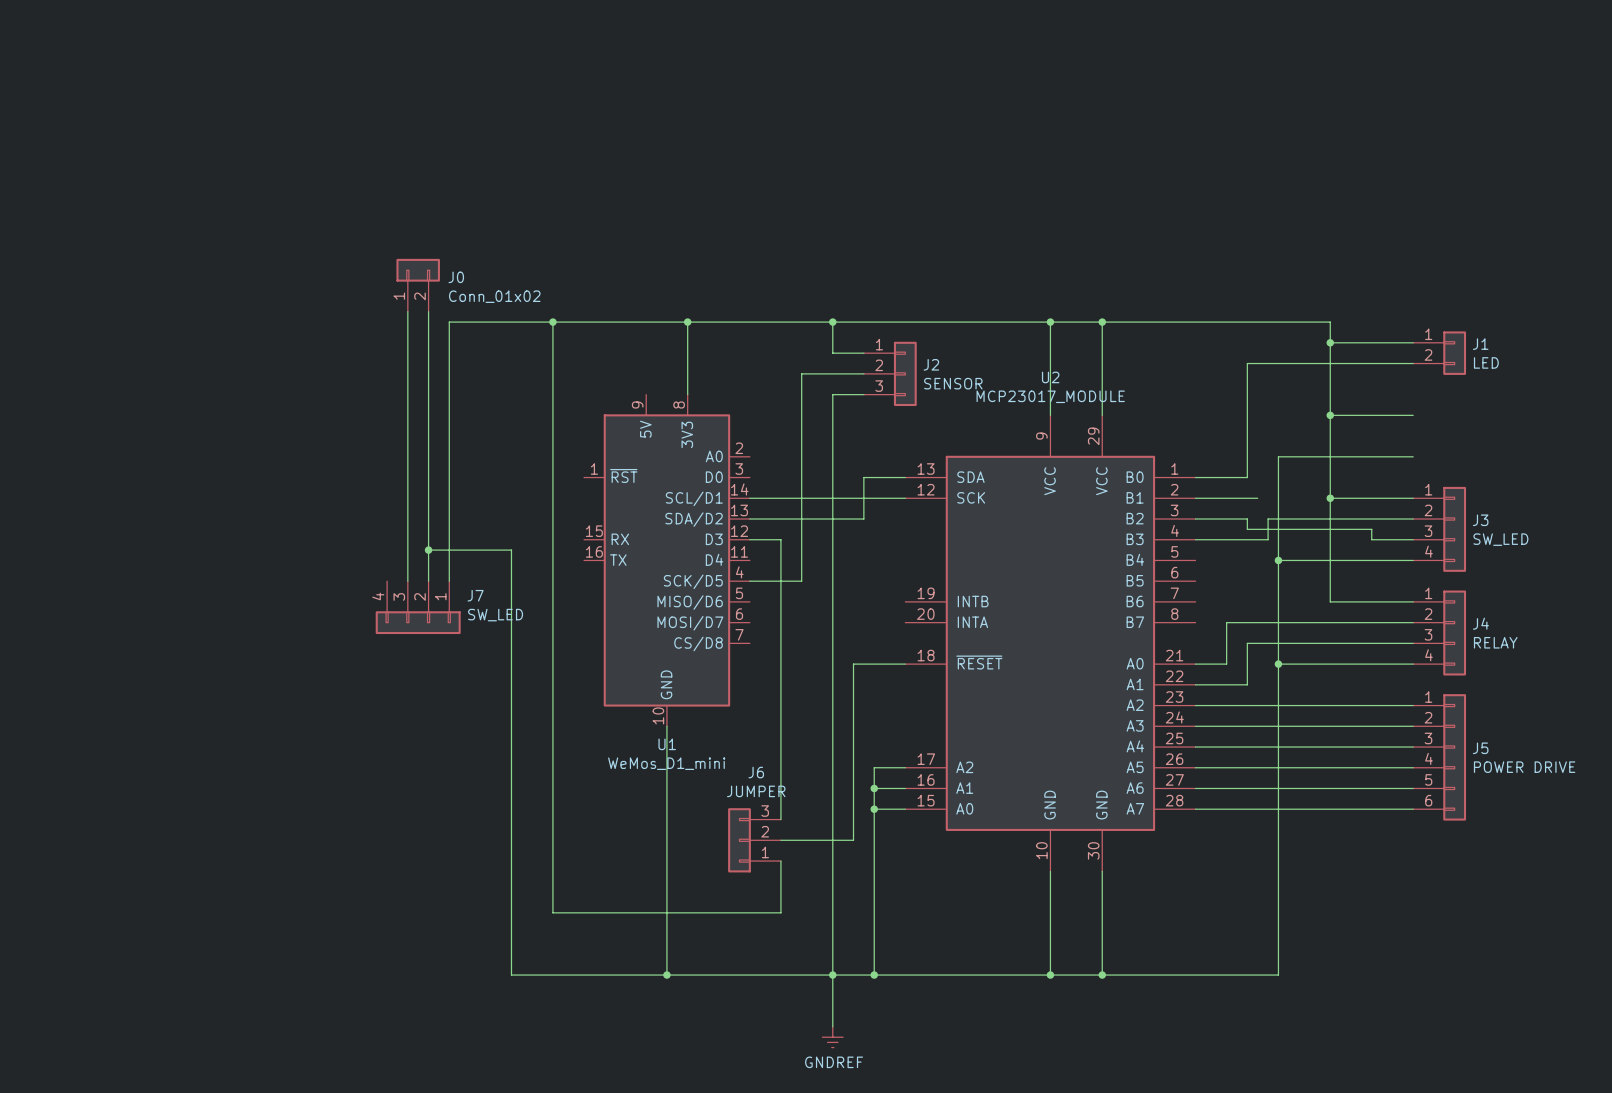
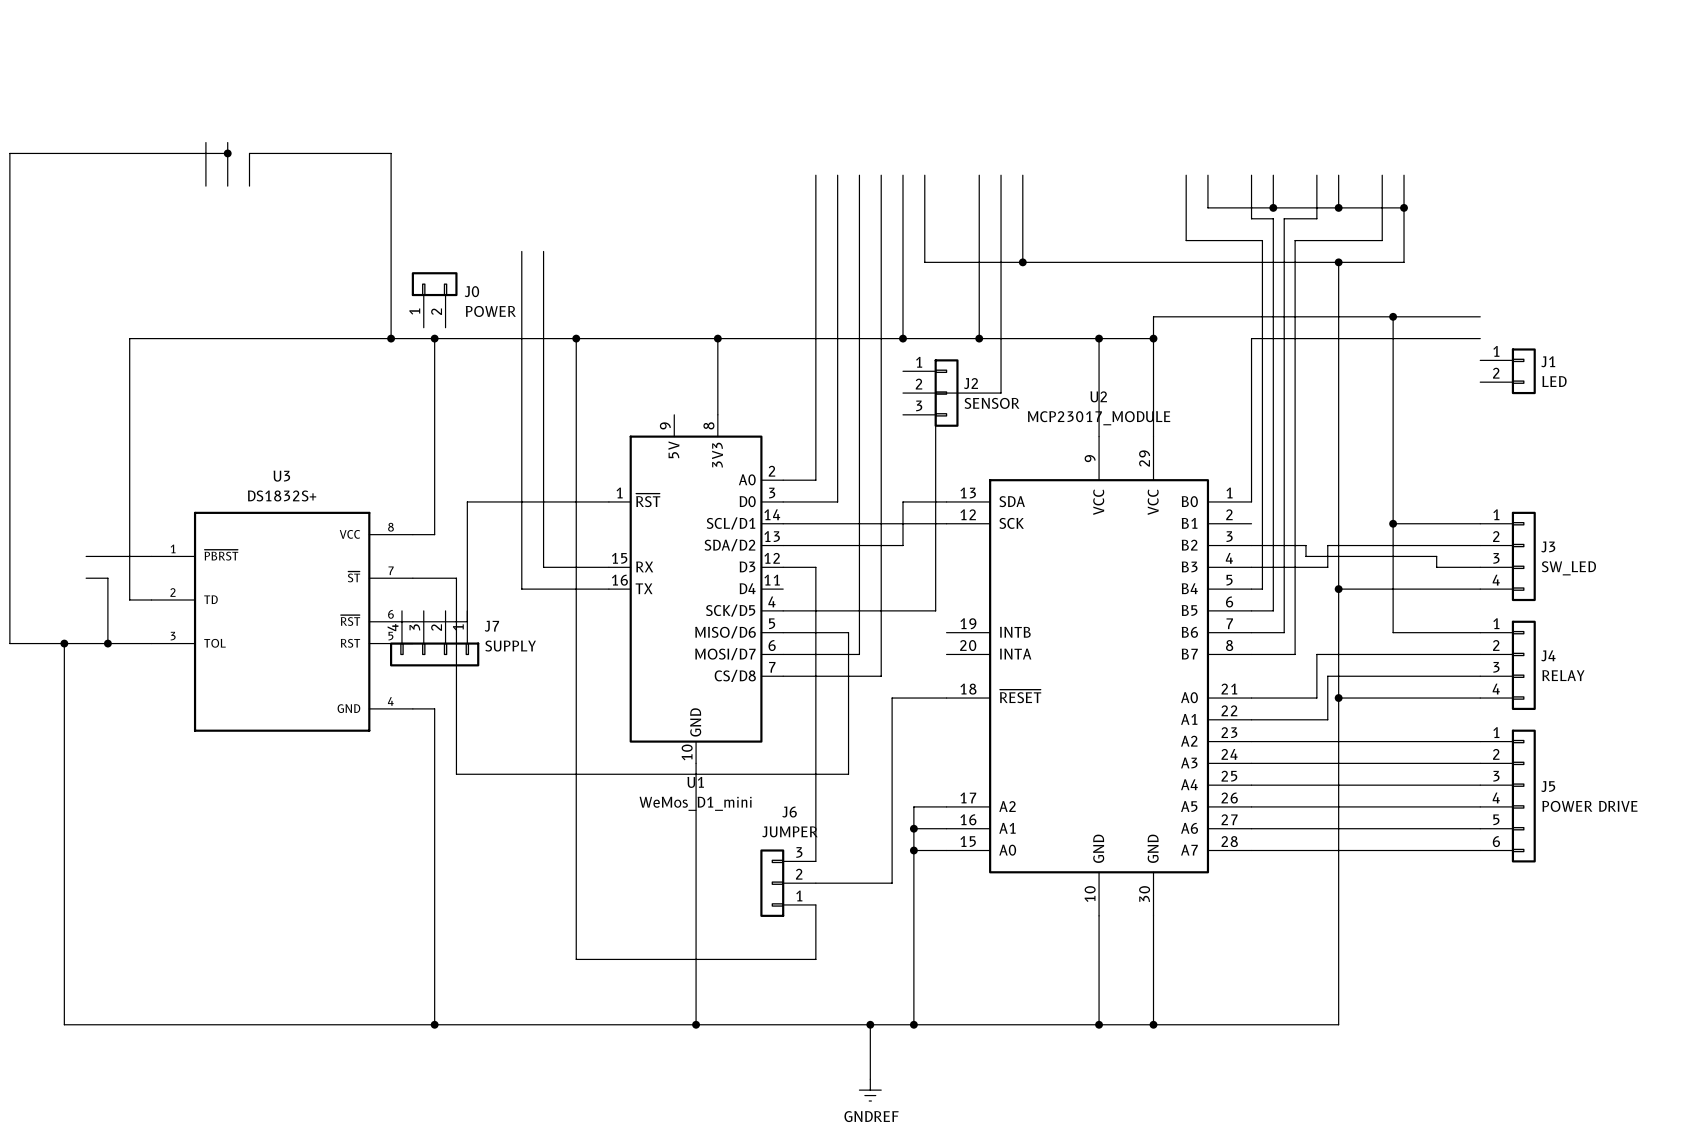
wire: none -> (205, 142) (205, 186)
wire: none -> (227, 142) (227, 186)
wire: none -> (227, 153) (9, 153) (9, 643) (151, 643)
junction: none -> (227, 153)
wire: none -> (815, 175) (815, 480) (783, 480)
wire: none -> (859, 175) (859, 654) (783, 654)
wire: none -> (881, 175) (881, 676) (783, 676)
wire: none -> (903, 175) (903, 338)
wire: none -> (924, 175) (924, 262) (1404, 262) (1404, 175)
wire: none -> (979, 175) (979, 338)
wire: none -> (1001, 175) (1001, 393) (935, 393) (935, 610) (837, 610)
wire: none -> (1022, 175) (1022, 262)
wire: none -> (1186, 175) (1186, 240) (1262, 240) (1262, 589) (1251, 589)
wire: none -> (1207, 175) (1207, 207) (1404, 207)
wire: none -> (1251, 175) (1251, 218) (1273, 218) (1273, 610) (1251, 610)
wire: none -> (1273, 175) (1273, 207)
wire: none -> (1316, 175) (1316, 218) (1284, 218) (1284, 632) (1251, 632)
wire: none -> (1338, 175) (1338, 207)
wire: none -> (249, 186) (249, 153) (391, 153) (391, 338)
junction: none -> (1273, 207)
junction: none -> (1338, 207)
junction: none -> (1404, 207)
wire: none -> (521, 251) (521, 589) (608, 589)
wire: none -> (543, 251) (543, 567) (608, 567)
junction: none -> (1022, 262)
junction: none -> (1338, 262)
J0 value: Conn_01x02 (494, 296) -> POWER (490, 311)
wire: none -> (1393, 316) (1393, 338) (1480, 338)
wire: none -> (1480, 316) (1153, 316) (1153, 338)
wire: (407, 311) (407, 581) -> none
wire: (428, 311) (428, 581) -> none
junction: none -> (391, 338)
wire: none -> (434, 338) (434, 534) (412, 534)
junction: none -> (434, 338)
wire: (449, 322) (449, 477) -> (608, 501) (467, 501)
wire: none -> (467, 338) (129, 338) (129, 599) (151, 599)
wire: (832, 322) (832, 353) (863, 353) -> none
junction position: (832, 322) -> (903, 338)
junction: none -> (979, 338)
wire: (1102, 322) (1195, 322) -> (1251, 501) (1251, 338)
wire: (1330, 342) (1413, 342) -> none
junction position: (1330, 342) -> (1393, 316)
wire: (1413, 363) (1247, 363) (1247, 477) (1195, 477) -> none
wire: (801, 373) (863, 373) -> (837, 393) (837, 175)
wire: (863, 394) (832, 394) (832, 975) -> none
wire: (1330, 415) (1413, 415) -> none
junction: (1330, 415) -> none
wire: (1278, 456) (1413, 456) -> (1338, 480) (1338, 262)
wire: (801, 477) (801, 581) -> (837, 501) (783, 501)
wire: (1195, 498) (1257, 498) -> none
wire: none -> (86, 556) (151, 556)
wire: none -> (86, 578) (107, 578) (107, 643)
wire: none -> (412, 578) (445, 578)
junction: (428, 550) -> none
wire: (438, 550) (511, 550) (511, 975) -> (64, 643) (64, 1024) (532, 1024)
wire: none -> (456, 578) (456, 774) (848, 774) (848, 632) (783, 632)
wire: none -> (467, 610) (467, 621) (412, 621)
U3: none -> DS1832S+ (282, 621)
junction: none -> (64, 643)
junction: none -> (107, 643)
J7 value: SW_LED (495, 615) -> SUPPLY (510, 646)
wire: none -> (1251, 654) (1284, 654)
wire: (1226, 622) (1226, 664) -> (1316, 654) (1316, 698) (1284, 698)
wire: (1236, 622) (1257, 622) -> (1295, 654) (1295, 240) (1382, 240) (1382, 175)
wire: (1268, 643) (1247, 643) (1247, 684) -> (1327, 676) (1327, 719) (1305, 719)
wire: none -> (412, 708) (434, 708) (434, 1024)
junction: none -> (434, 1024)

